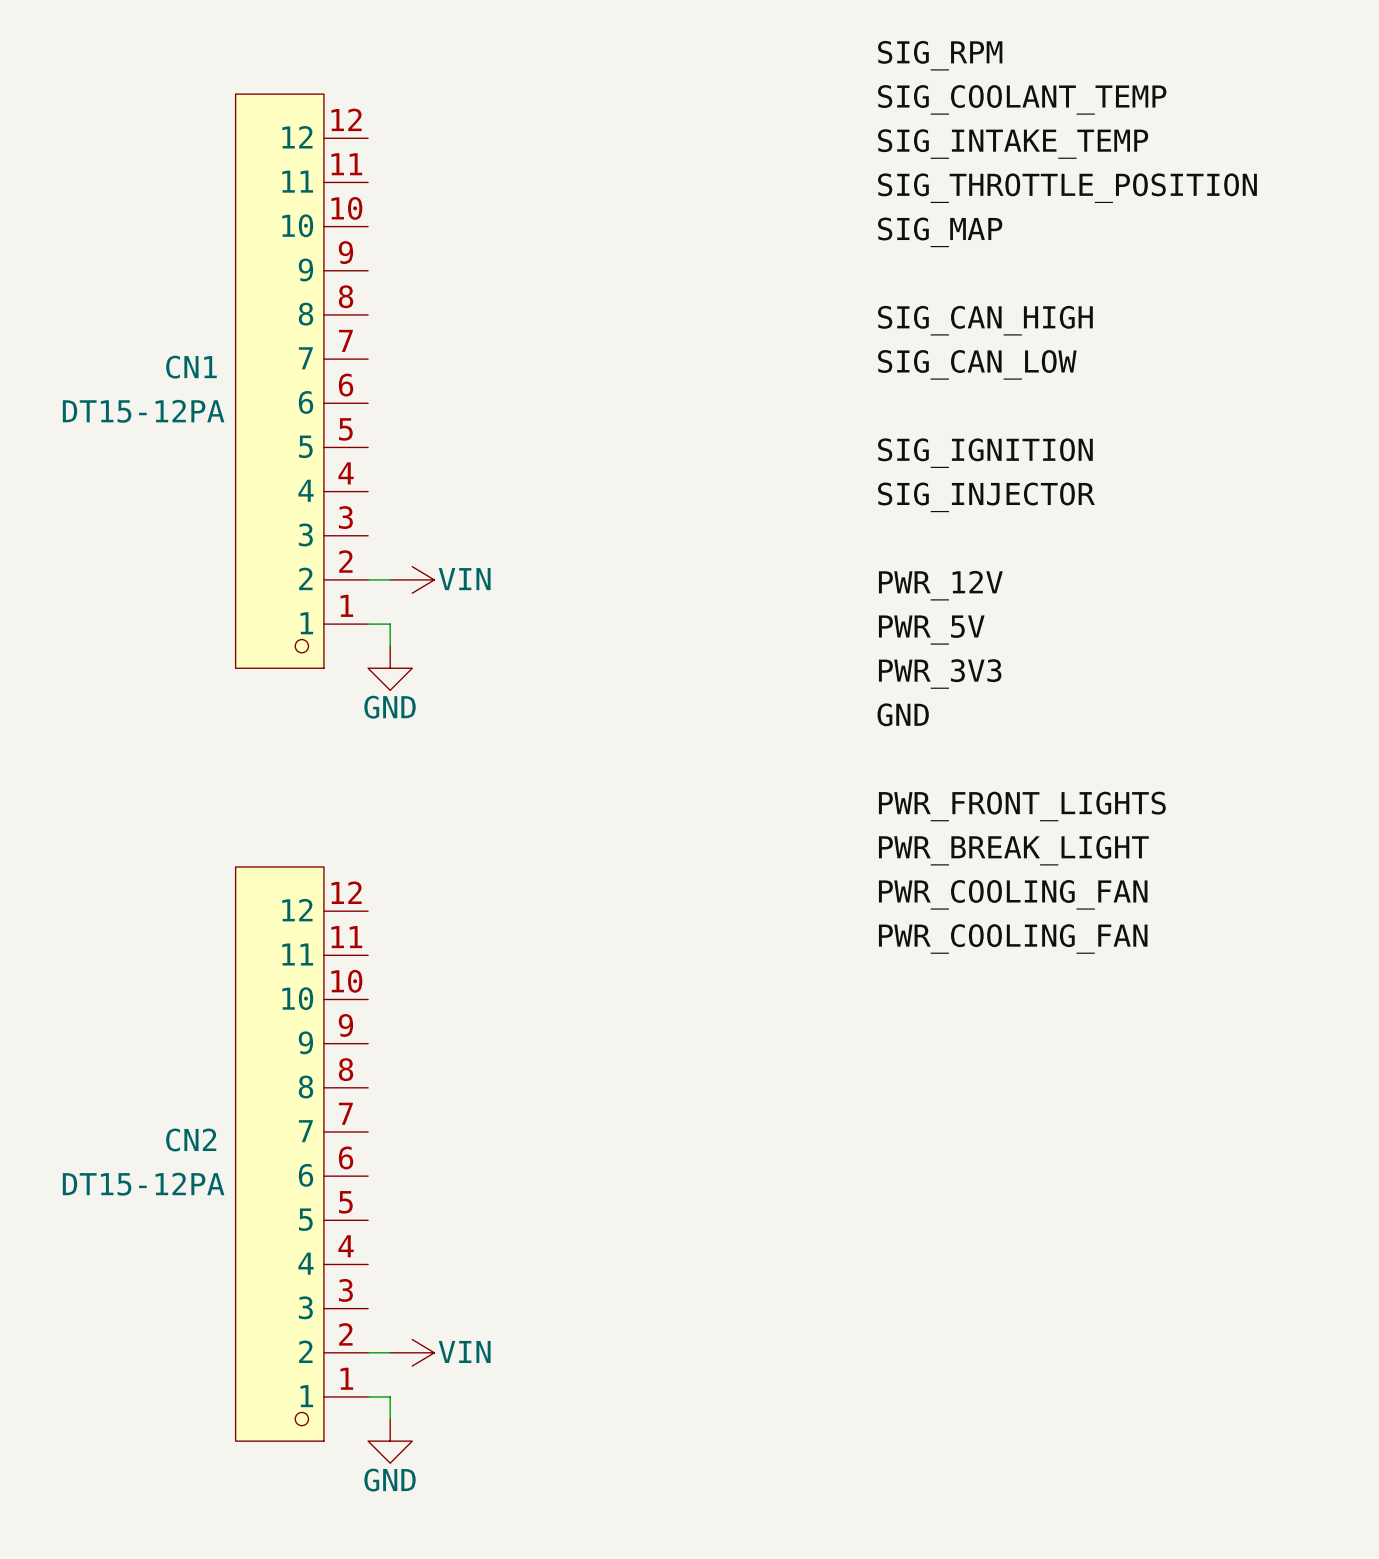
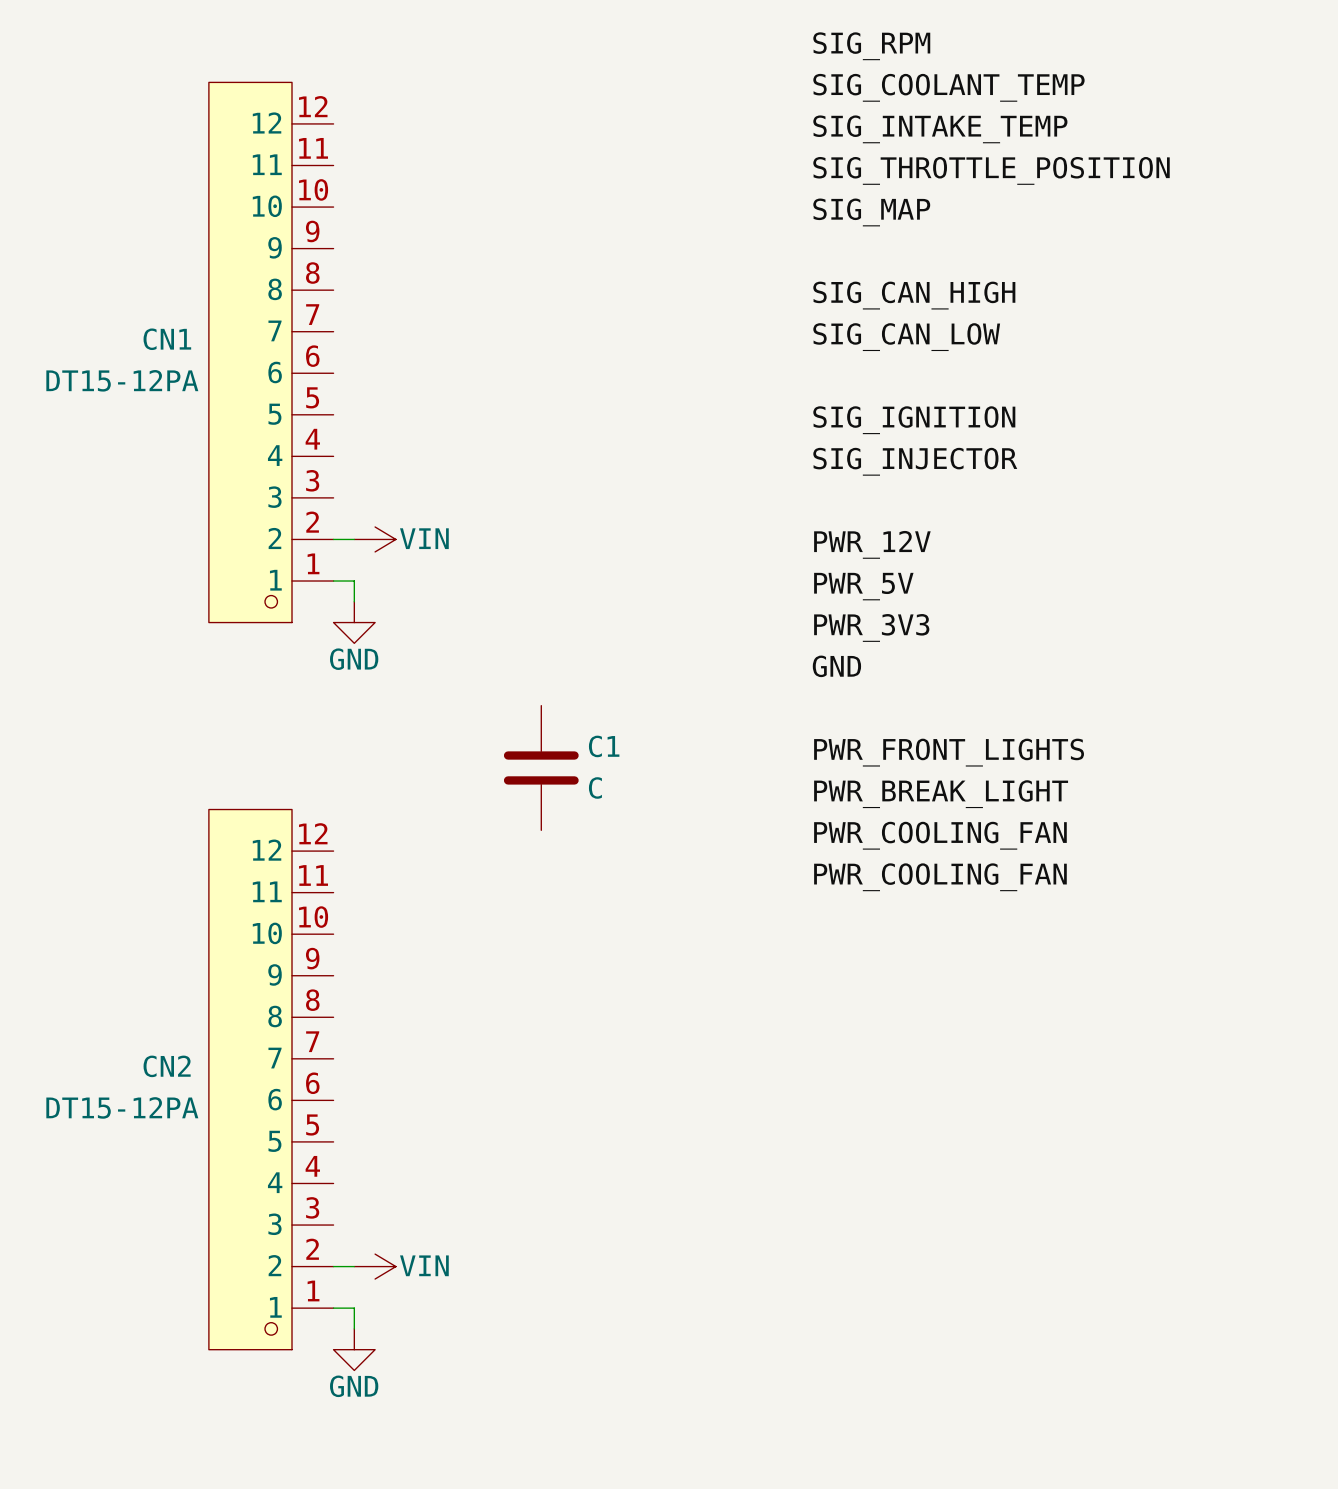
C1: none -> C (541, 767)

